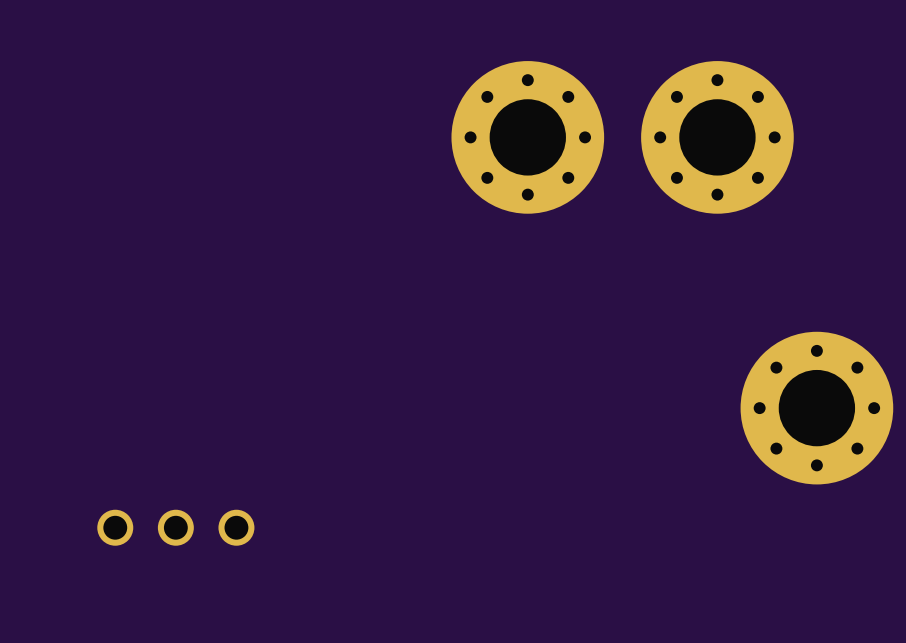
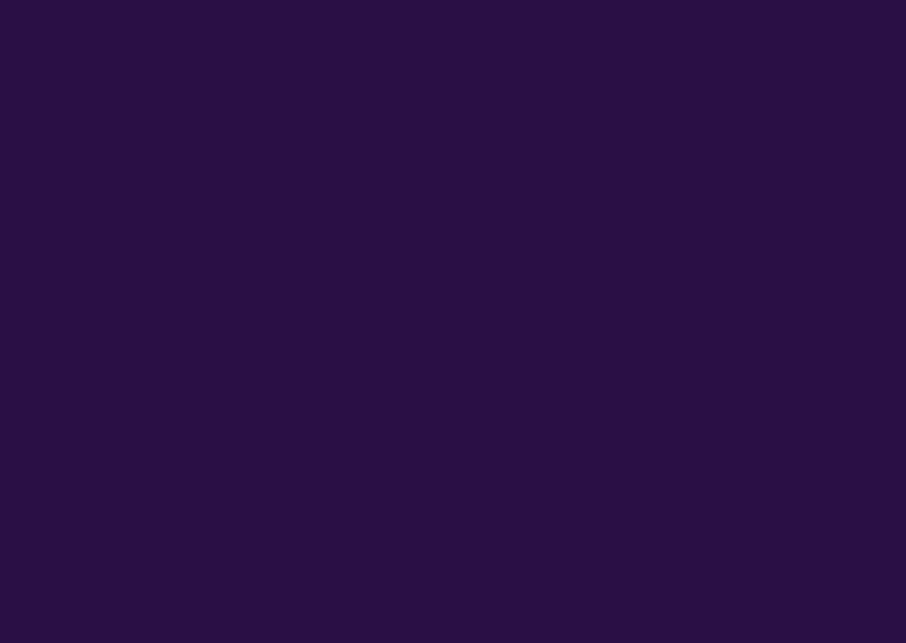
part: (527, 137) -> none
part: (717, 137) -> none
part: (816, 408) -> none
part: (175, 527) -> none

